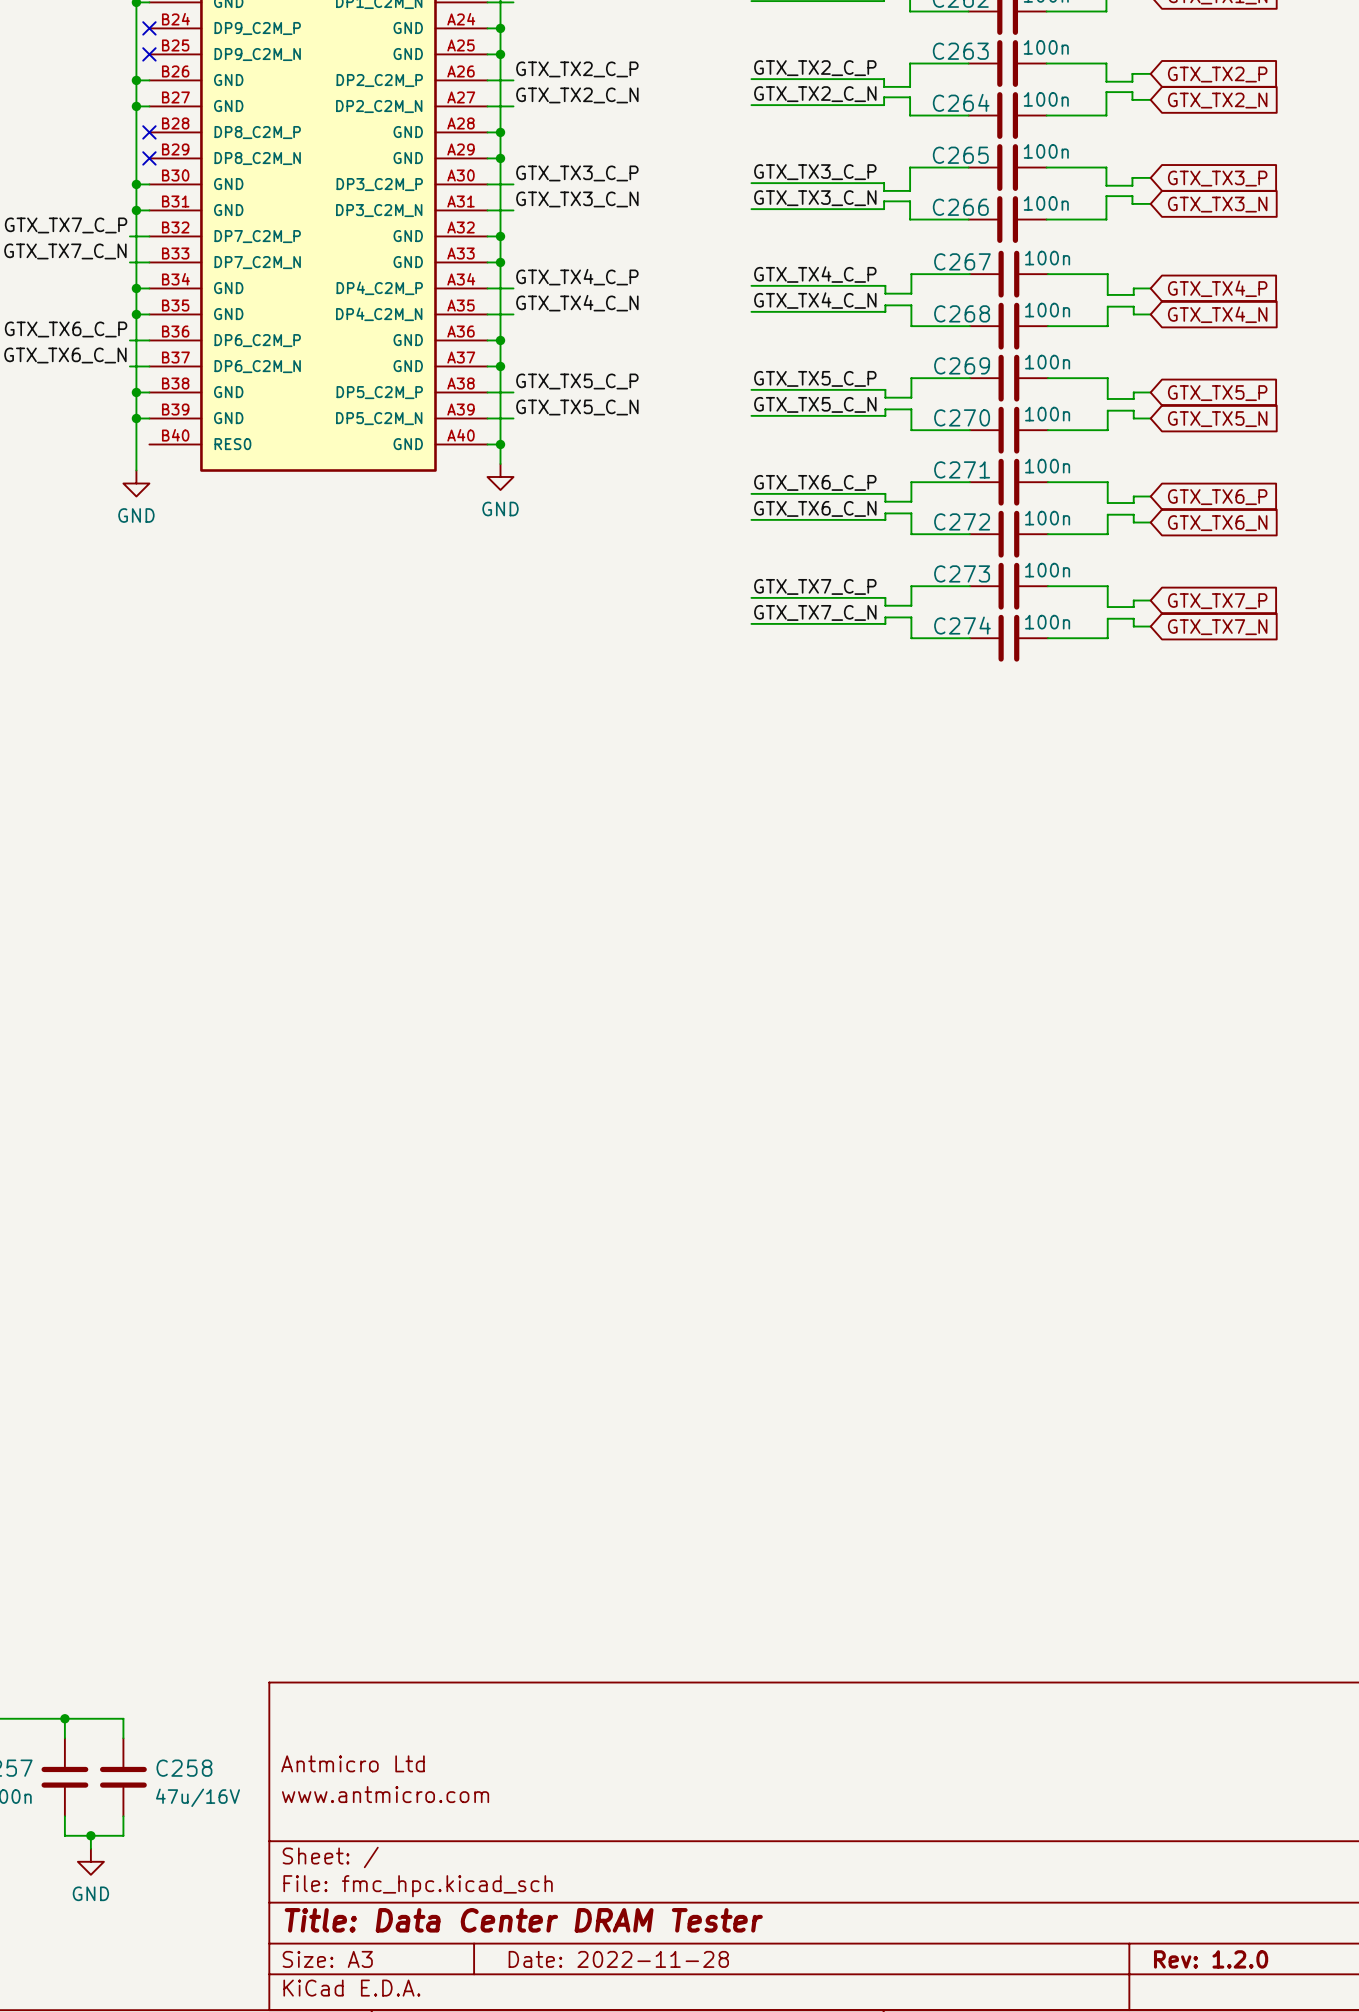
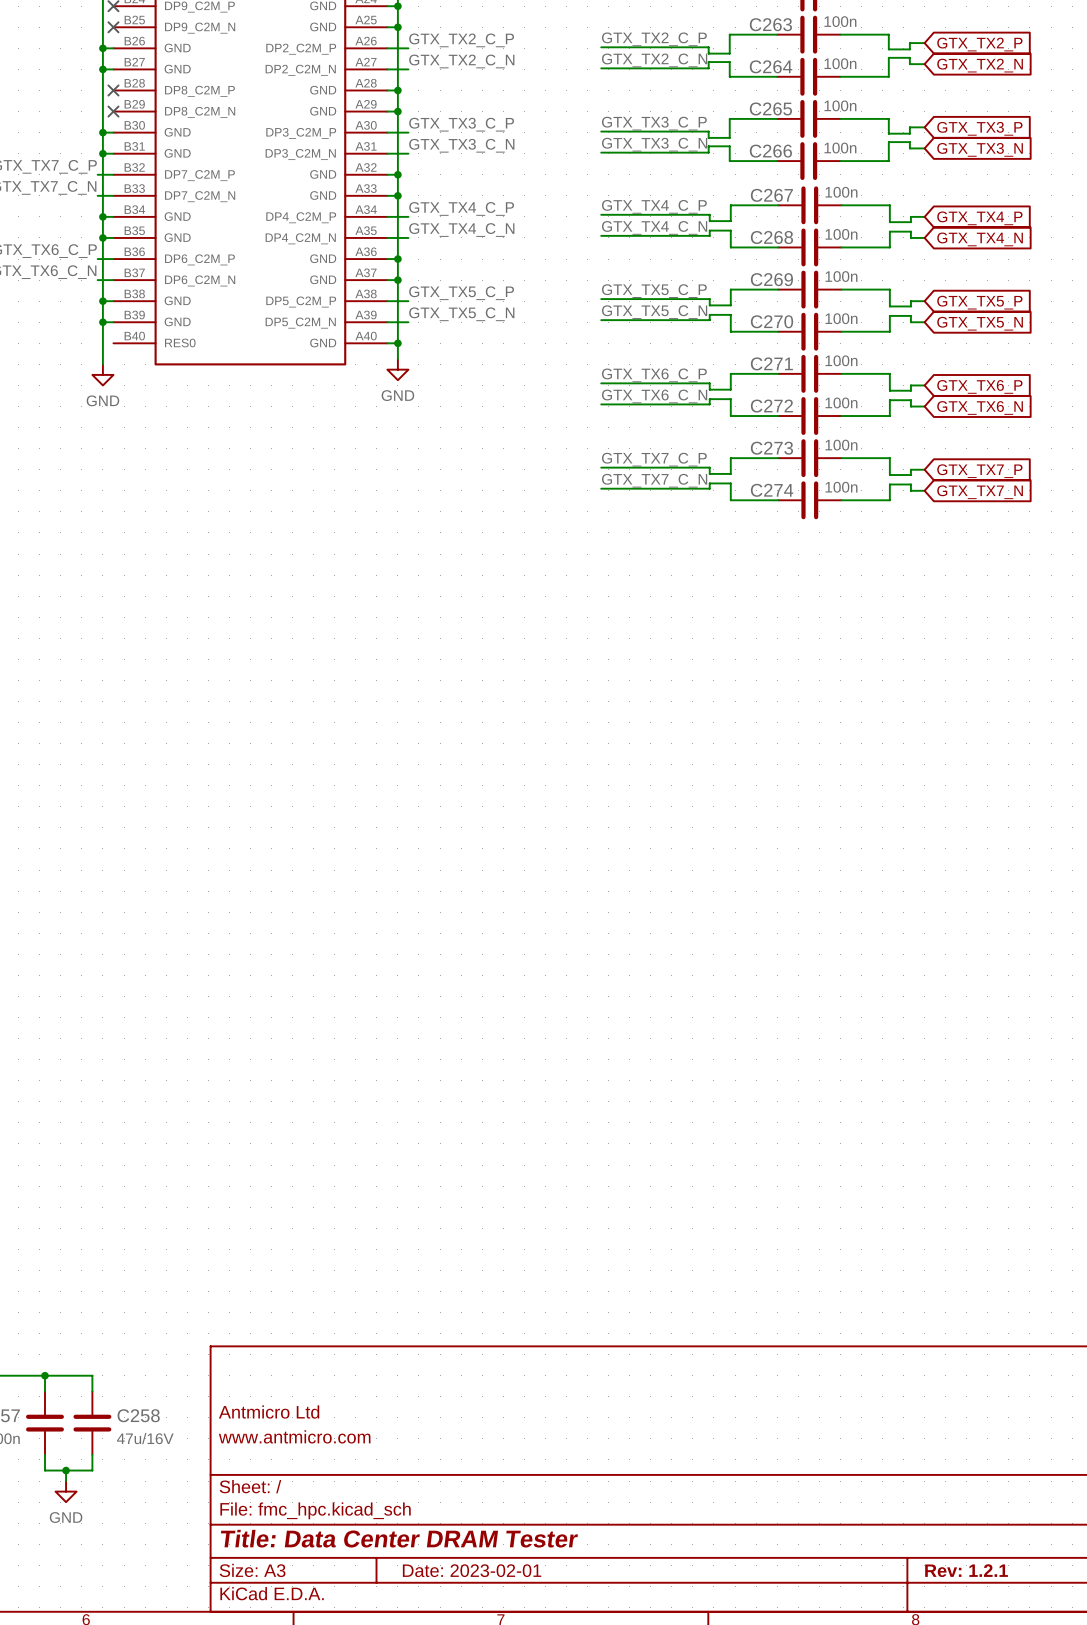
title block: Date: 2022-11-28 (618, 1959) -> Date: 2023-02-01 (472, 1570)
title block: Rev: 1.2.0 (1211, 1959) -> Rev: 1.2.1 (966, 1570)

